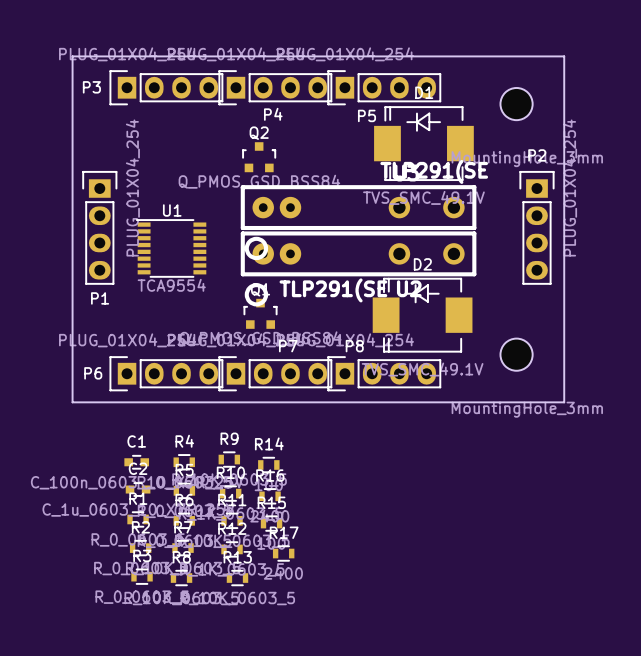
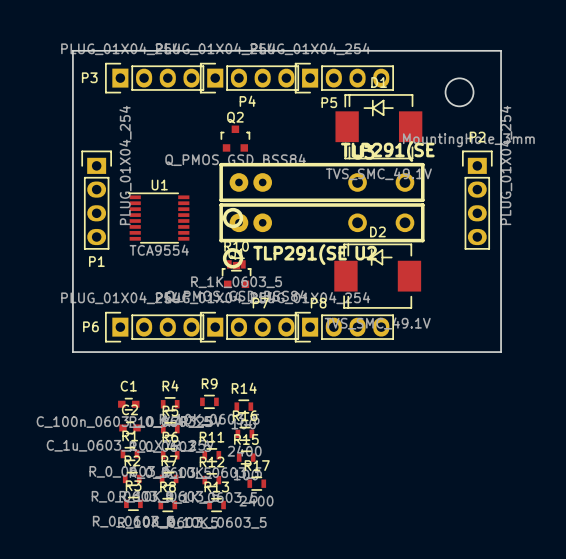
part: MountingHole_3mm (516, 354) -> none
R10 position: (230, 493) -> (236, 264)

